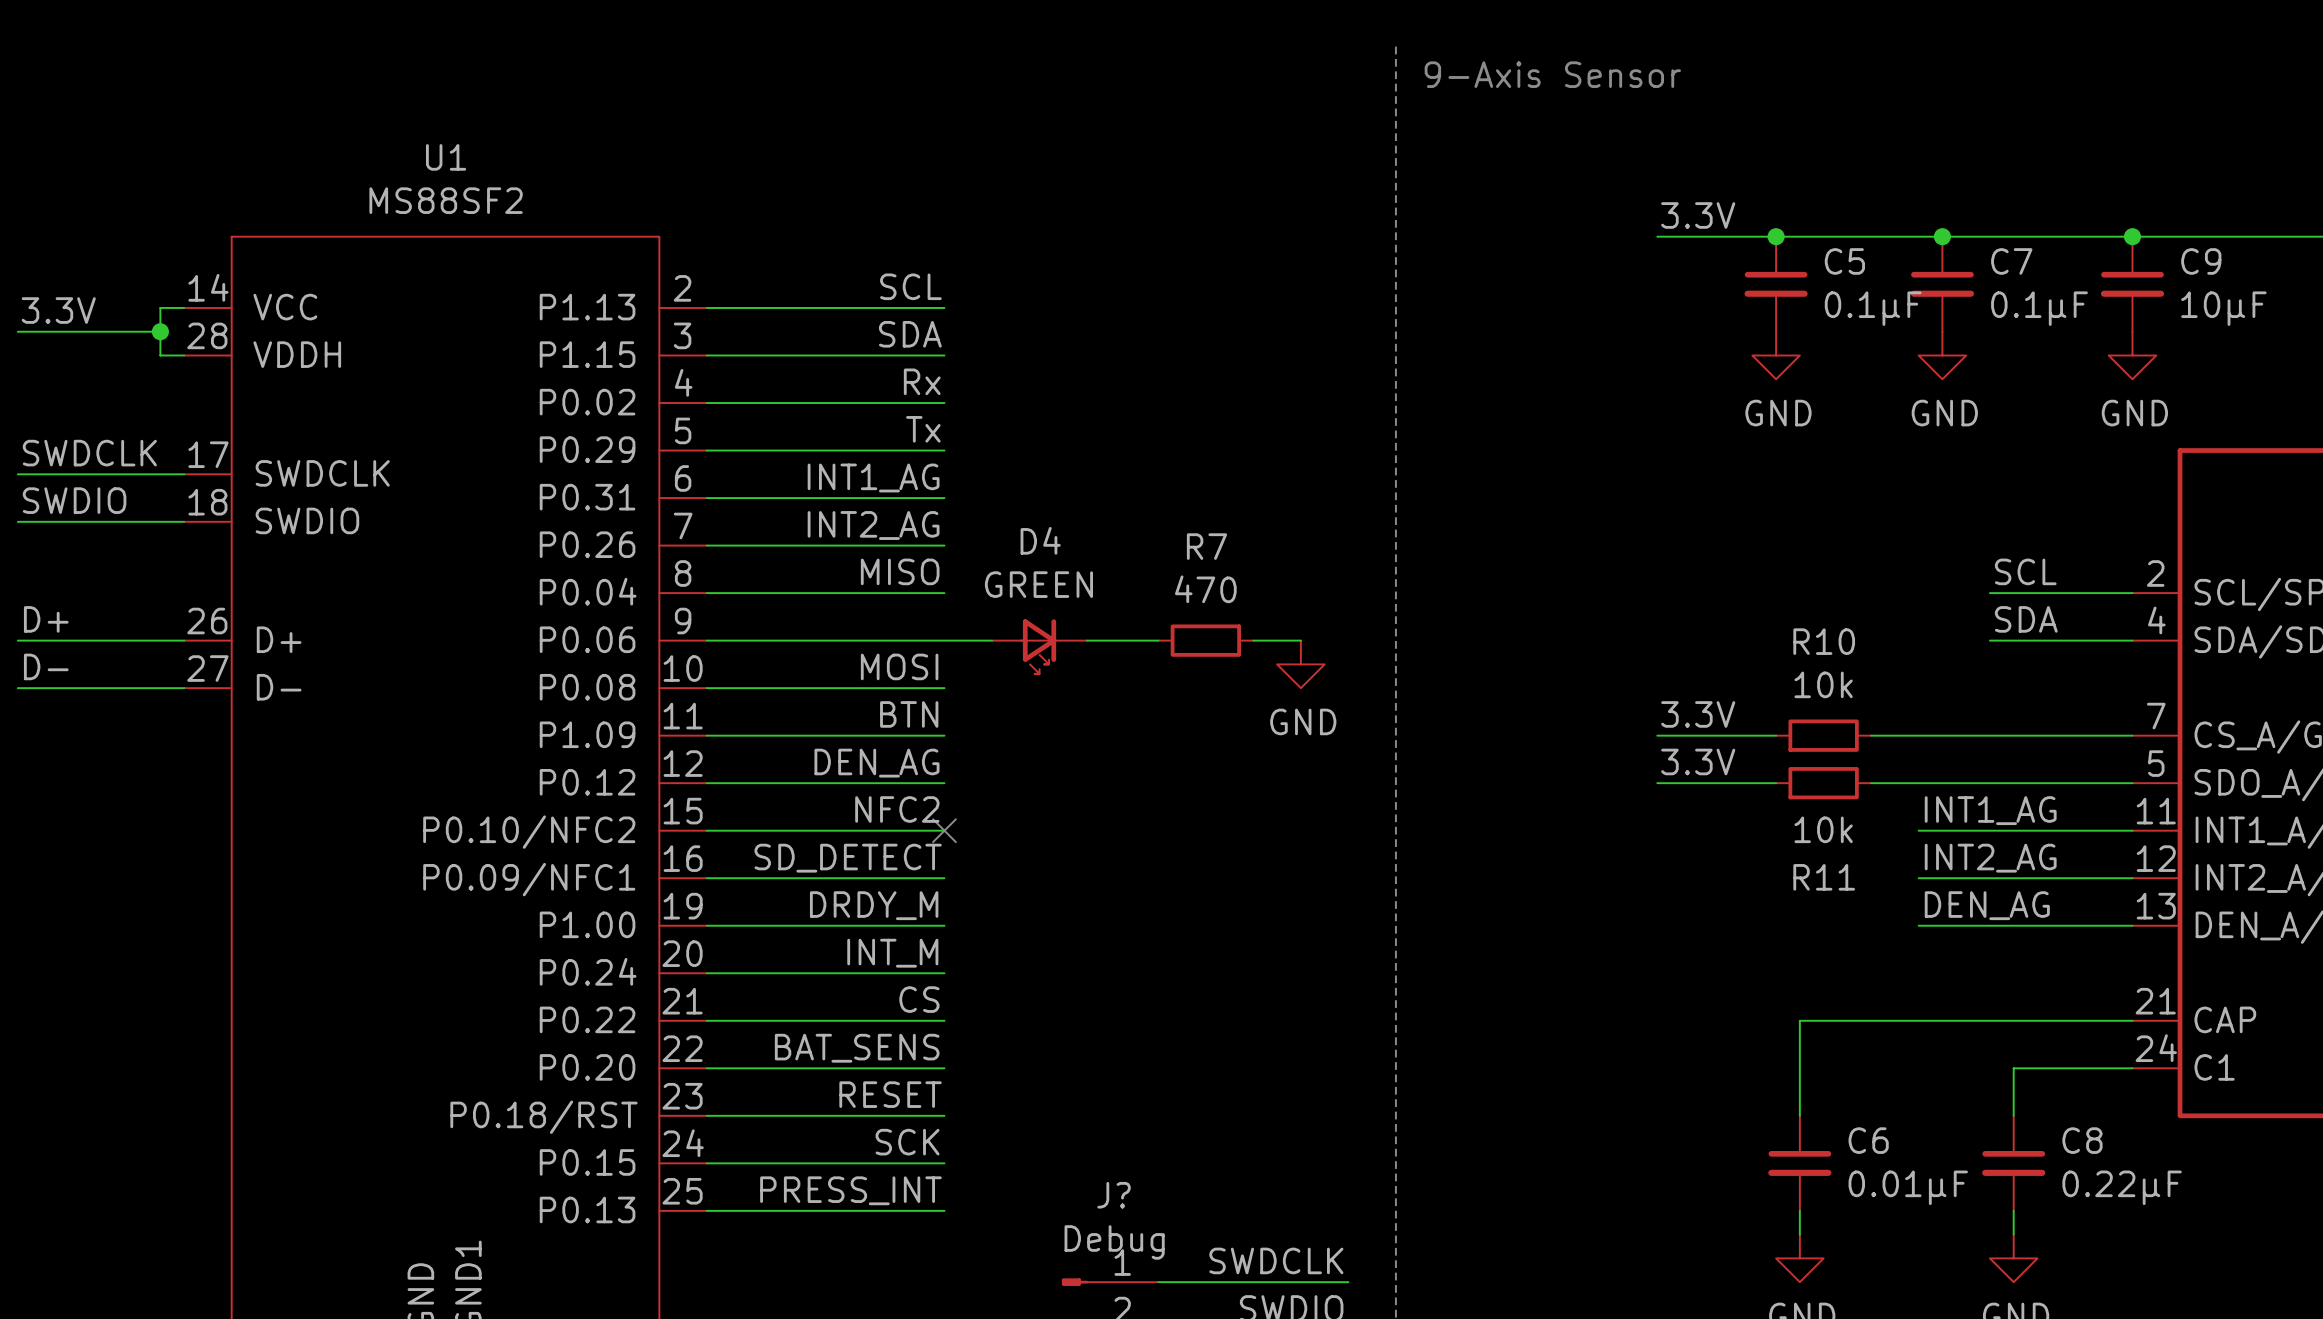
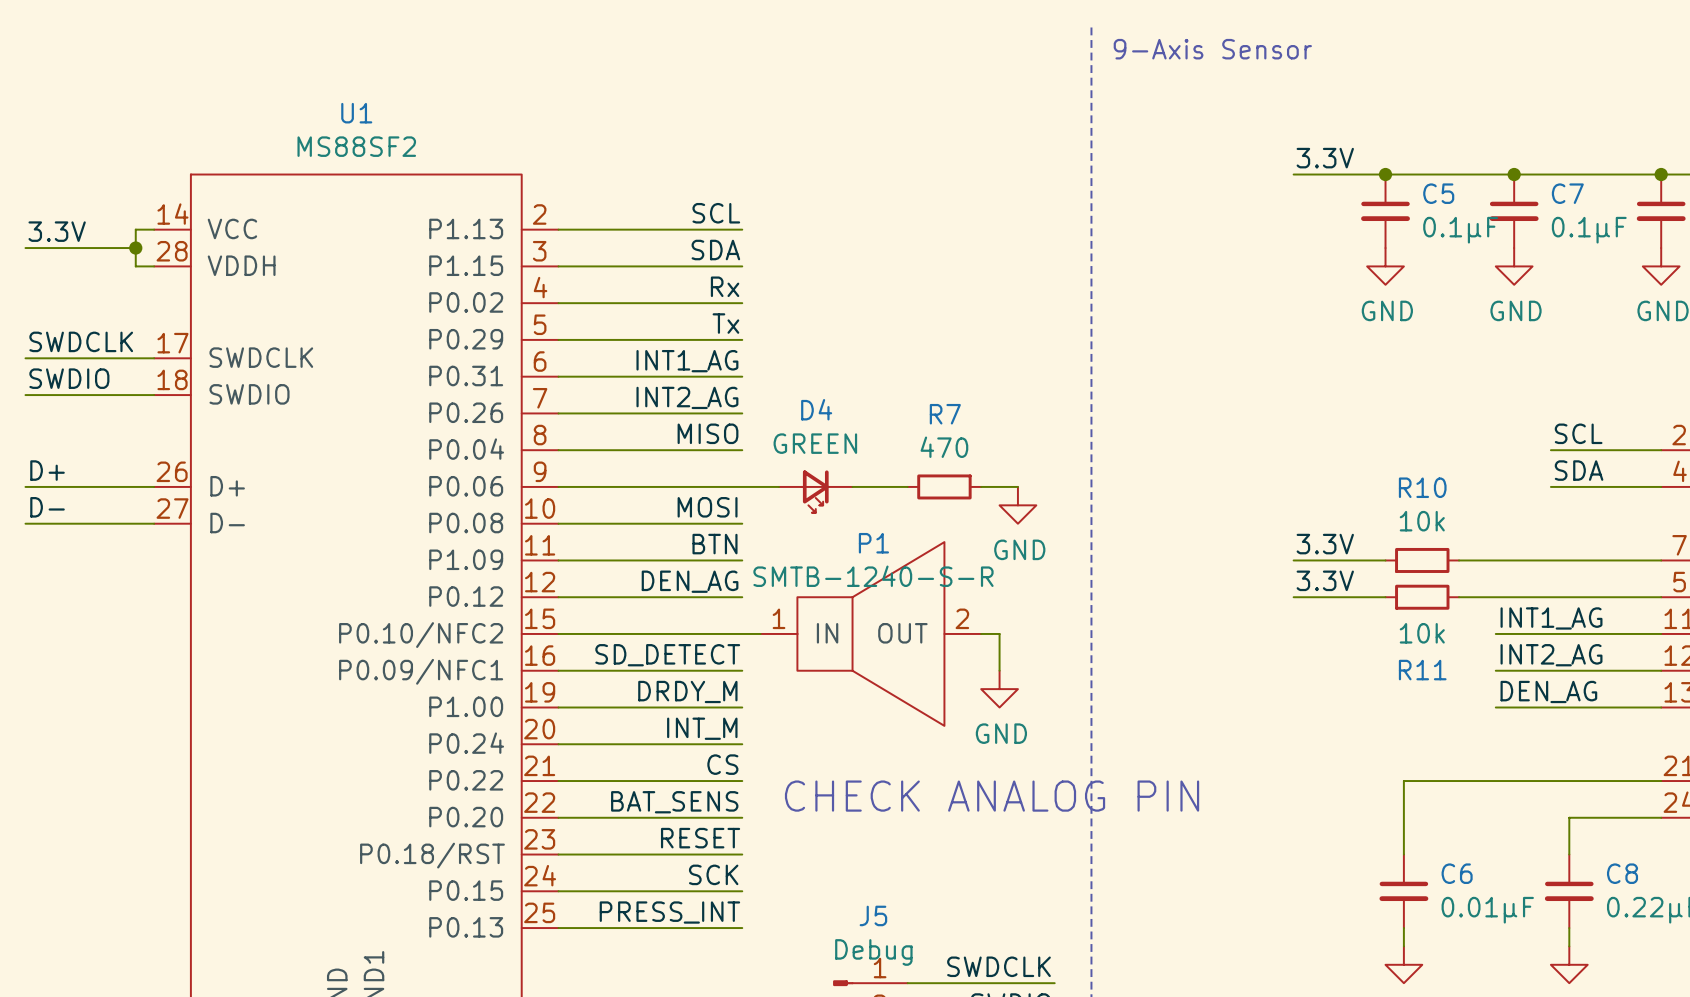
label: NFC2 (897, 809) -> none
wire: none -> (742, 633) (760, 633)
no-connect mark: (944, 830) -> none
P1: none -> SMTB-1240-S-R (870, 633)
wire: none -> (981, 633) (999, 633) (999, 670)
power symbol: none -> GND (999, 689)
text: none -> CHECK ANALOG PIN (992, 796)
J? name: J? (1114, 1195) -> J5 (873, 915)

